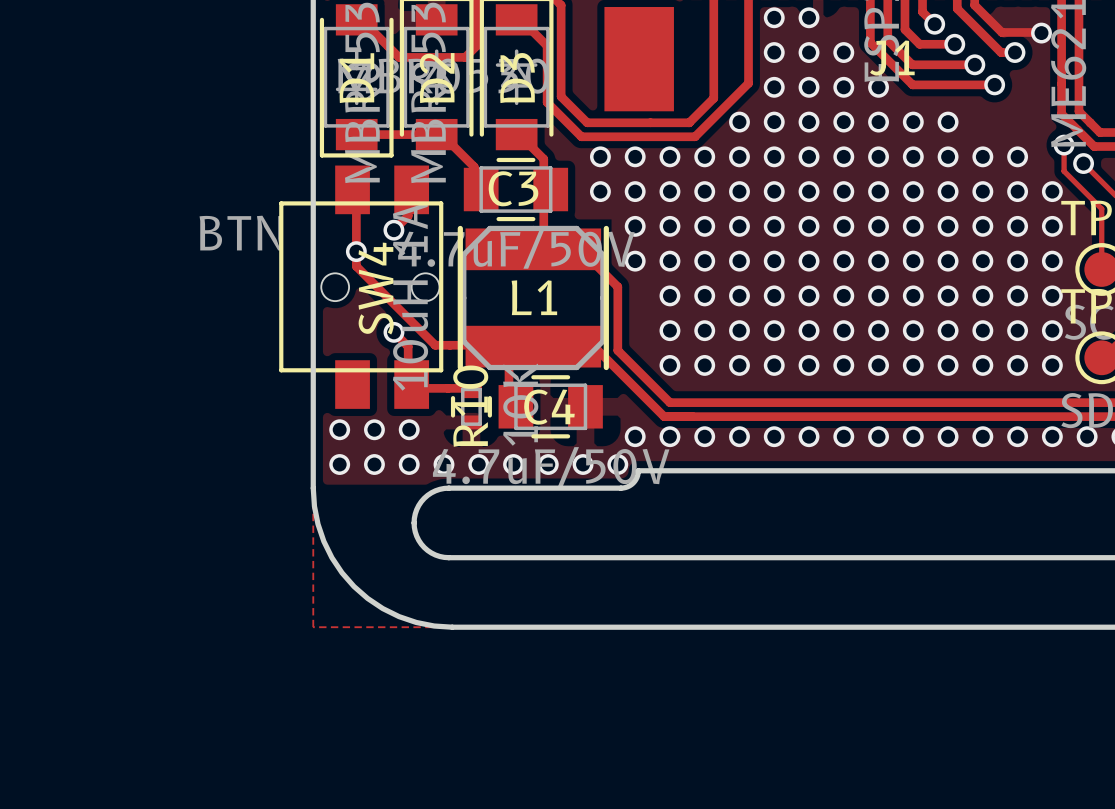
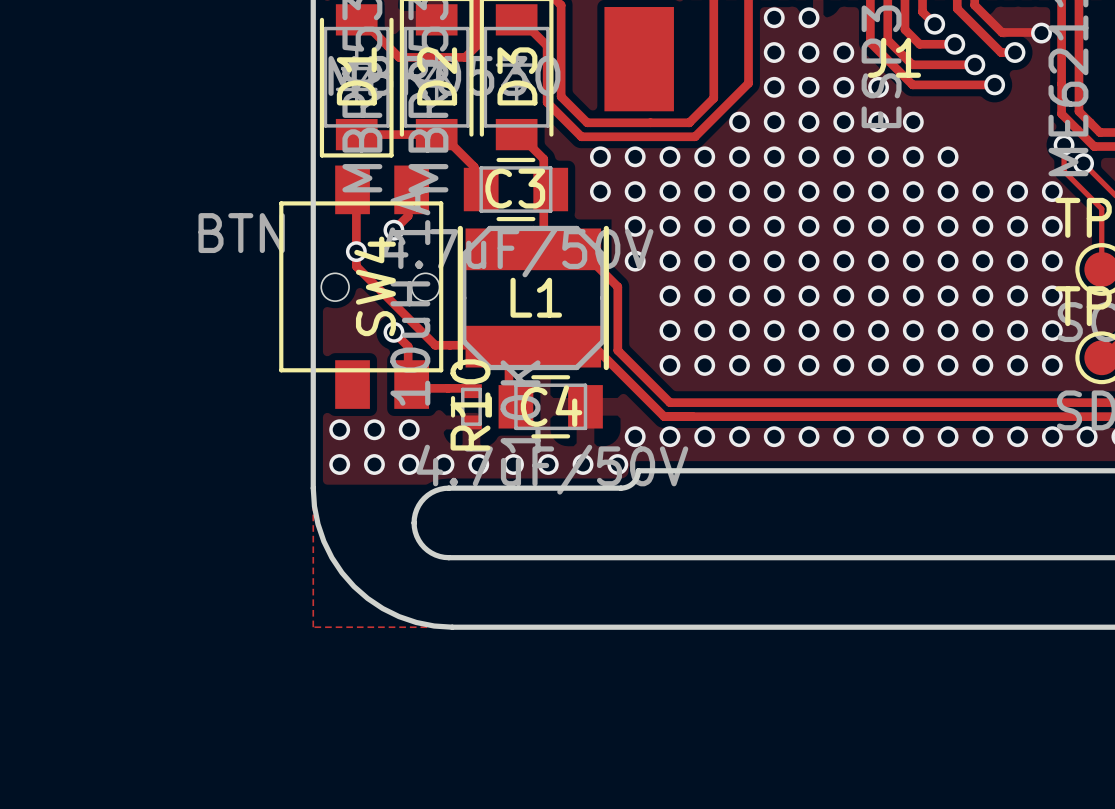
via: (948, 122) -> none
via: (982, 156) -> none
via: (1017, 156) -> none

